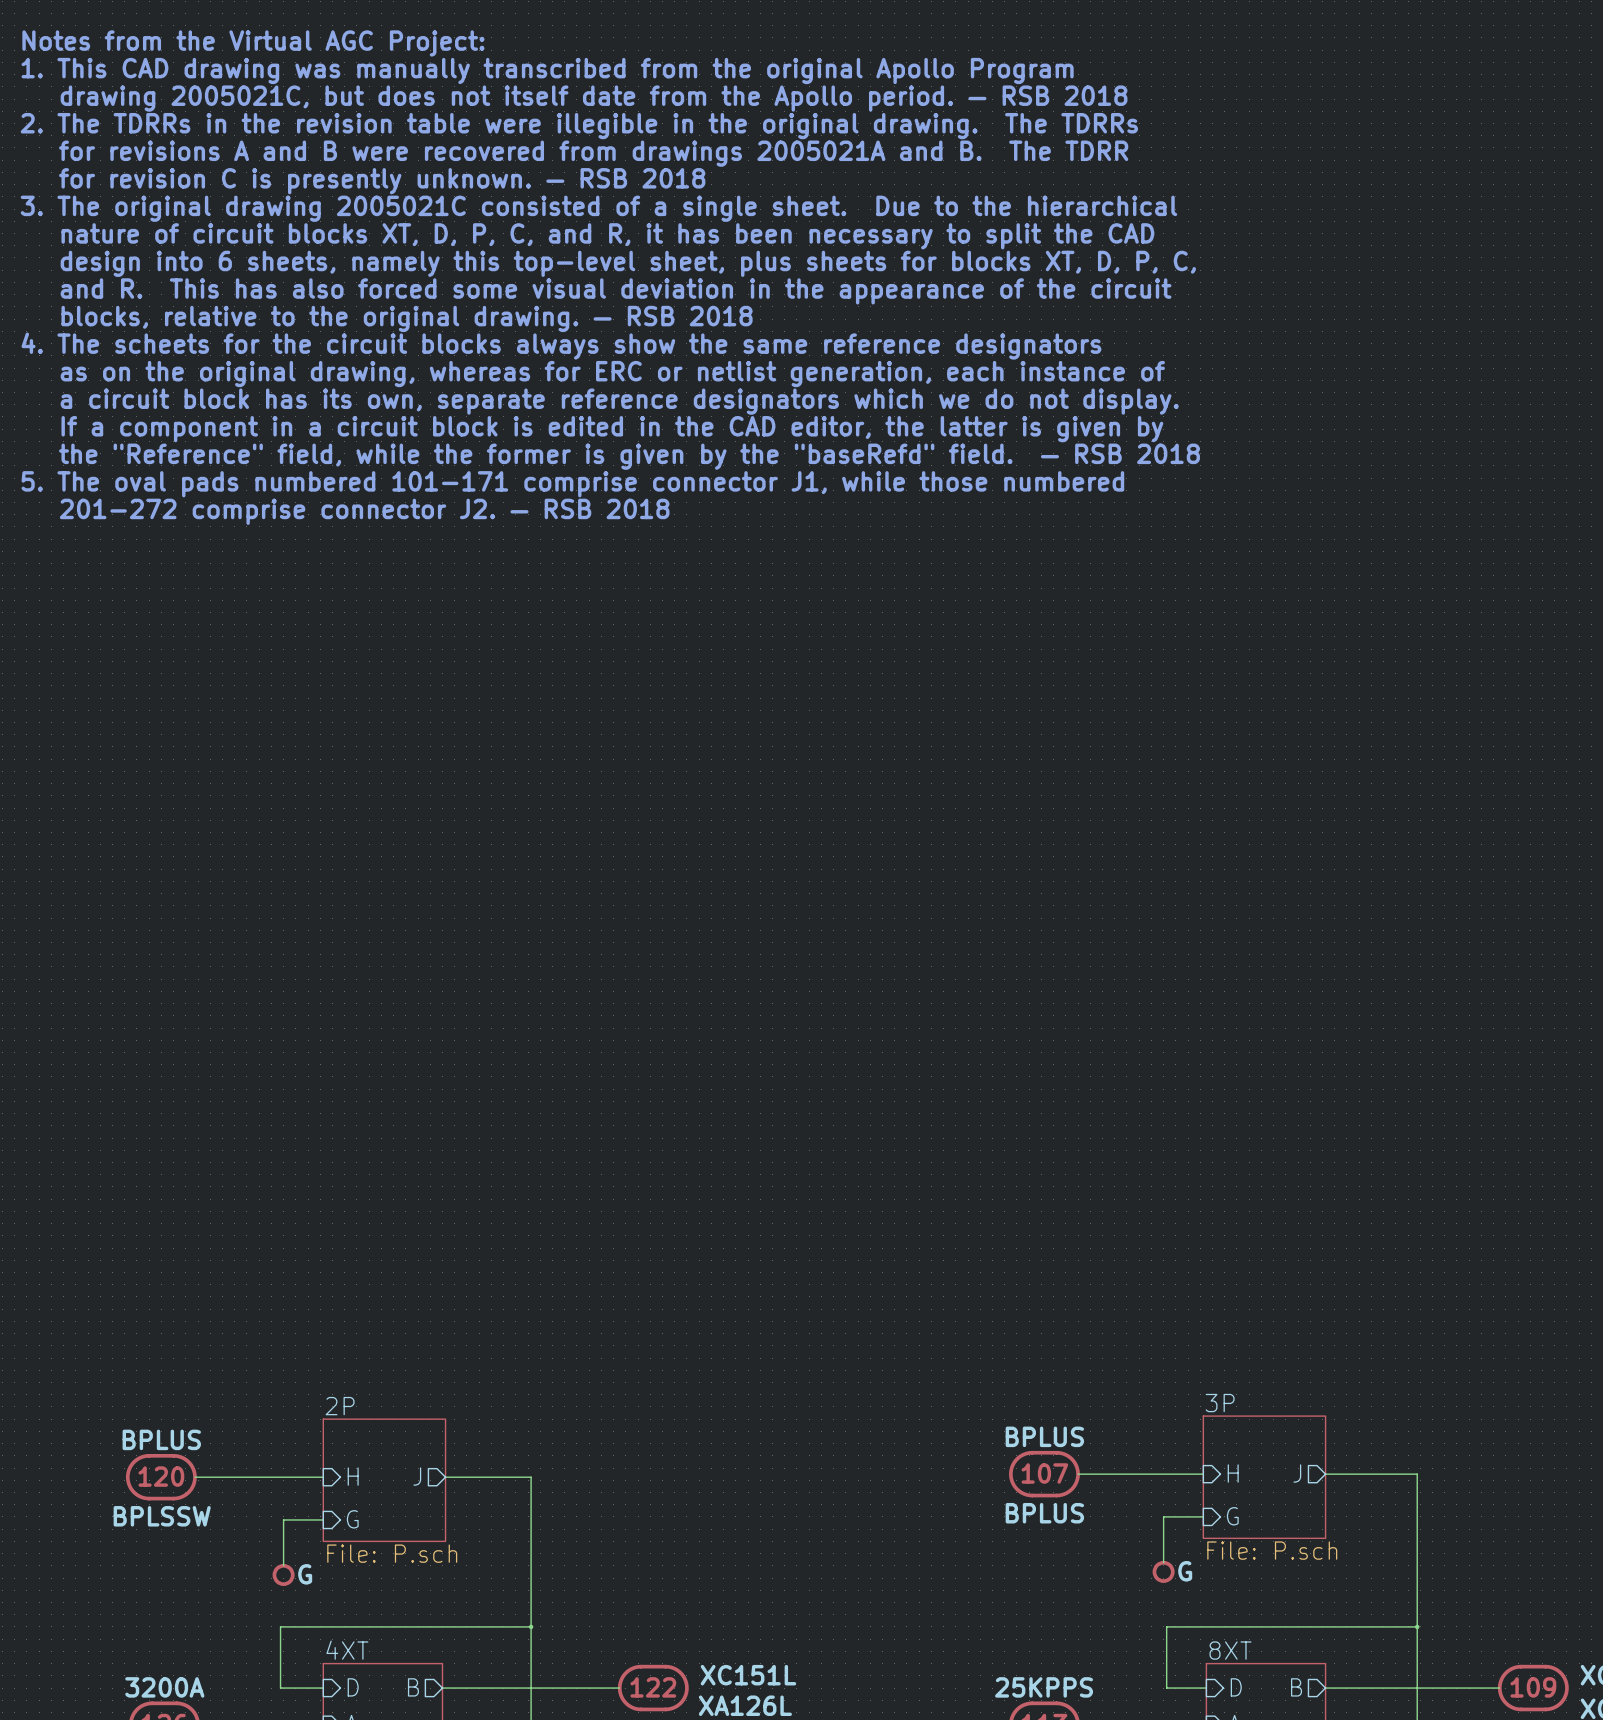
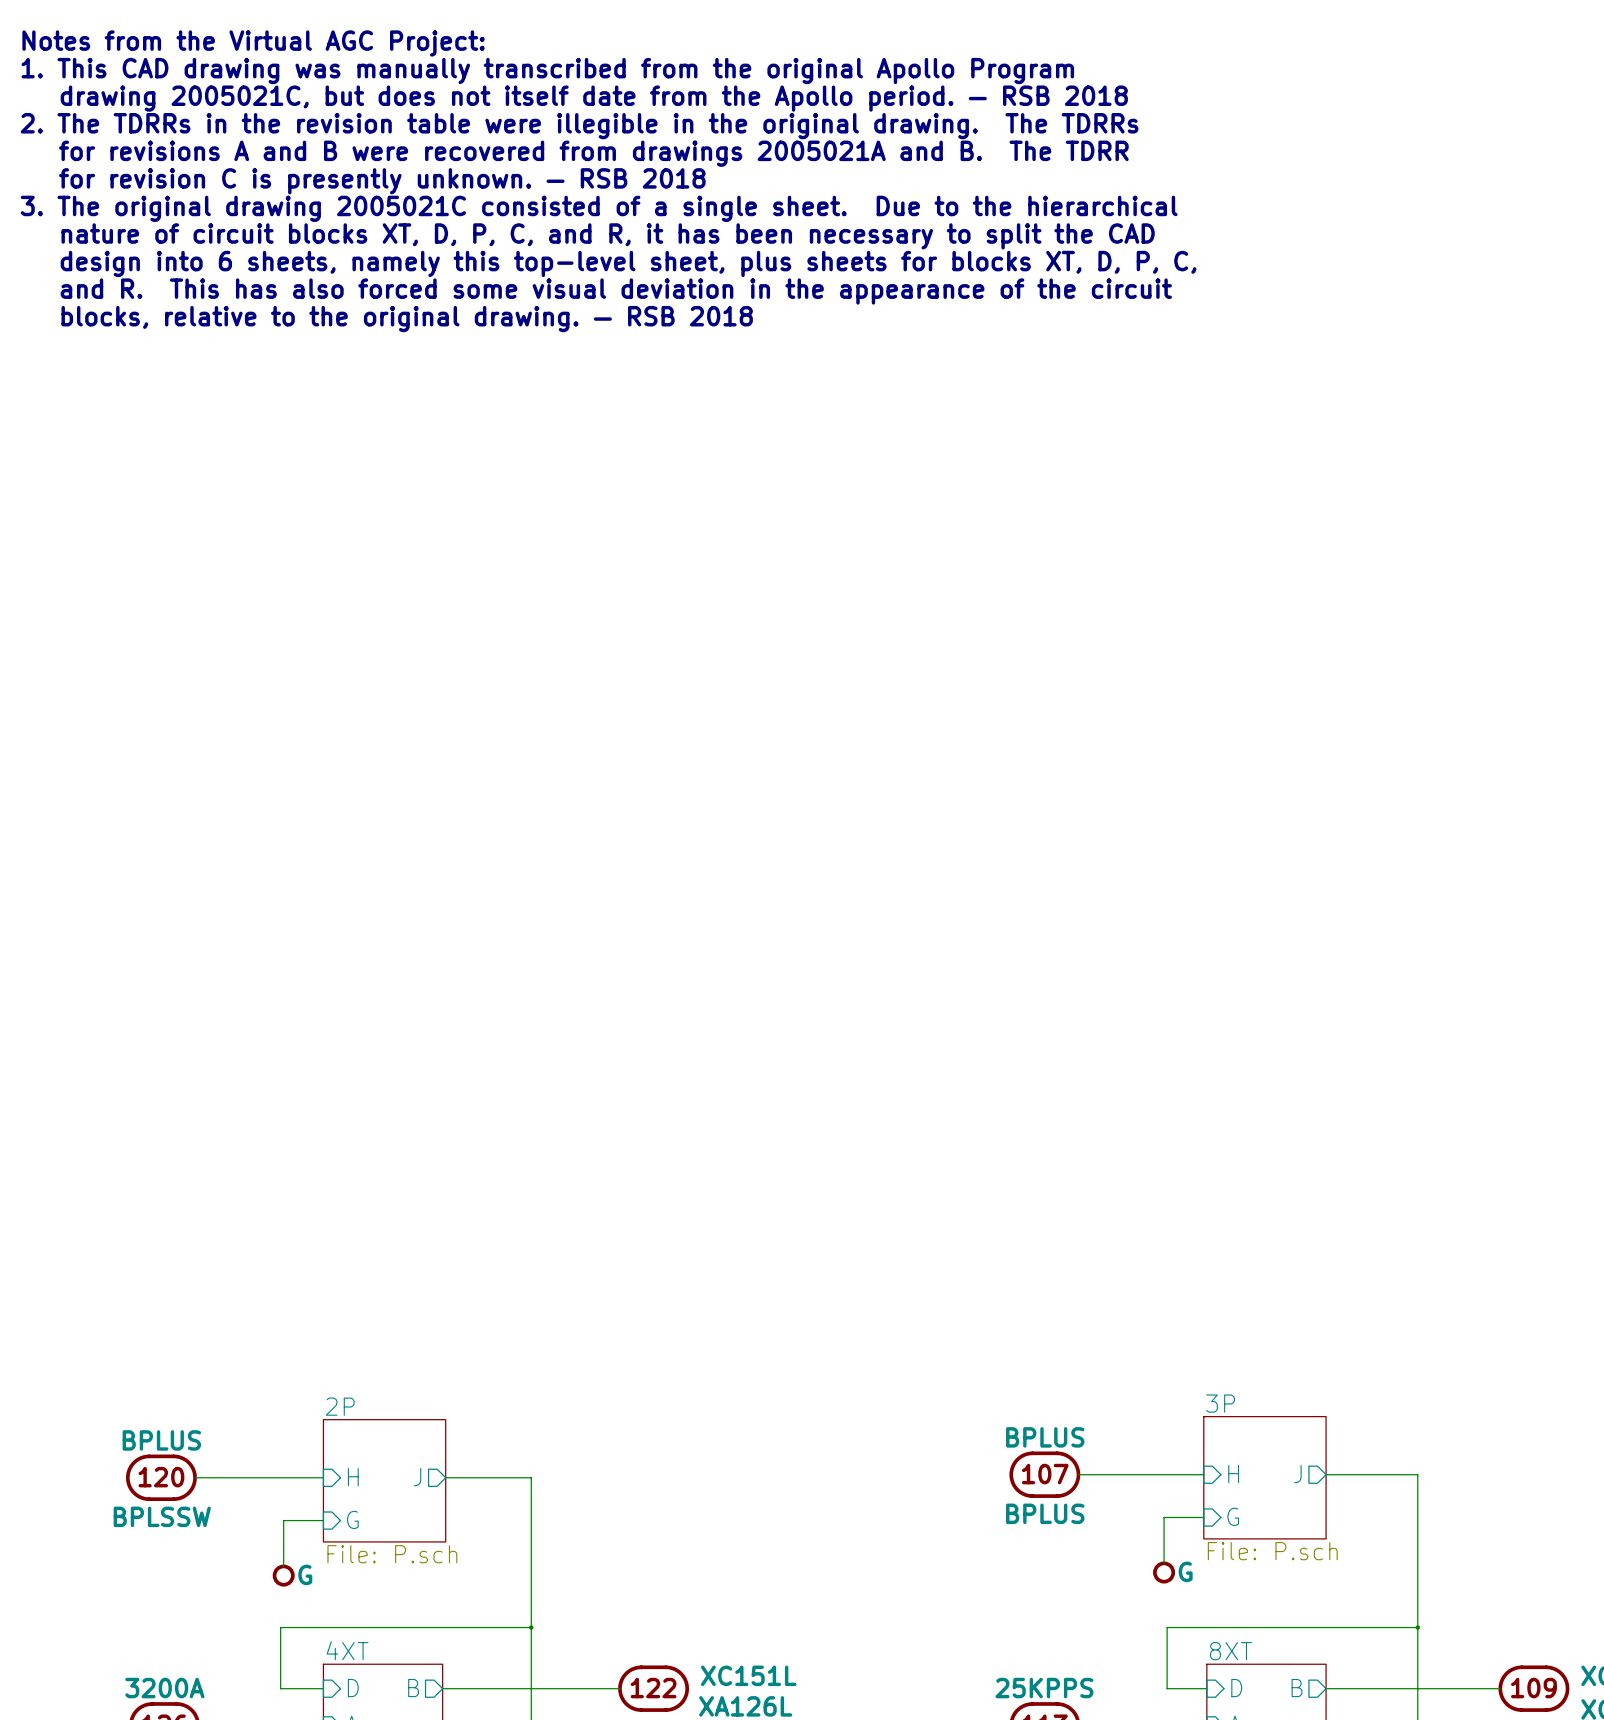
text: 4. The scheets for the circuit blocks always show the same reference designators (561, 346) -> none
text: as on the original drawing, whereas for ERC or netlist generation, each instance of (612, 374) -> none
text: a circuit block has its own, separate reference designators which we do not display. (619, 401) -> none
text: If a component in a circuit block is edited in the CAD editor, the latter is given by (612, 429) -> none
text: the "Reference" field, while the former is given by the "baseRefd" field. — RSB 2018 (629, 456) -> none
text: 5. The oval pads numbered 101-171 comprise connector J1, while those numbered (572, 484) -> none
text: 201-272 comprise connector J2. — RSB 2018 (364, 511) -> none

